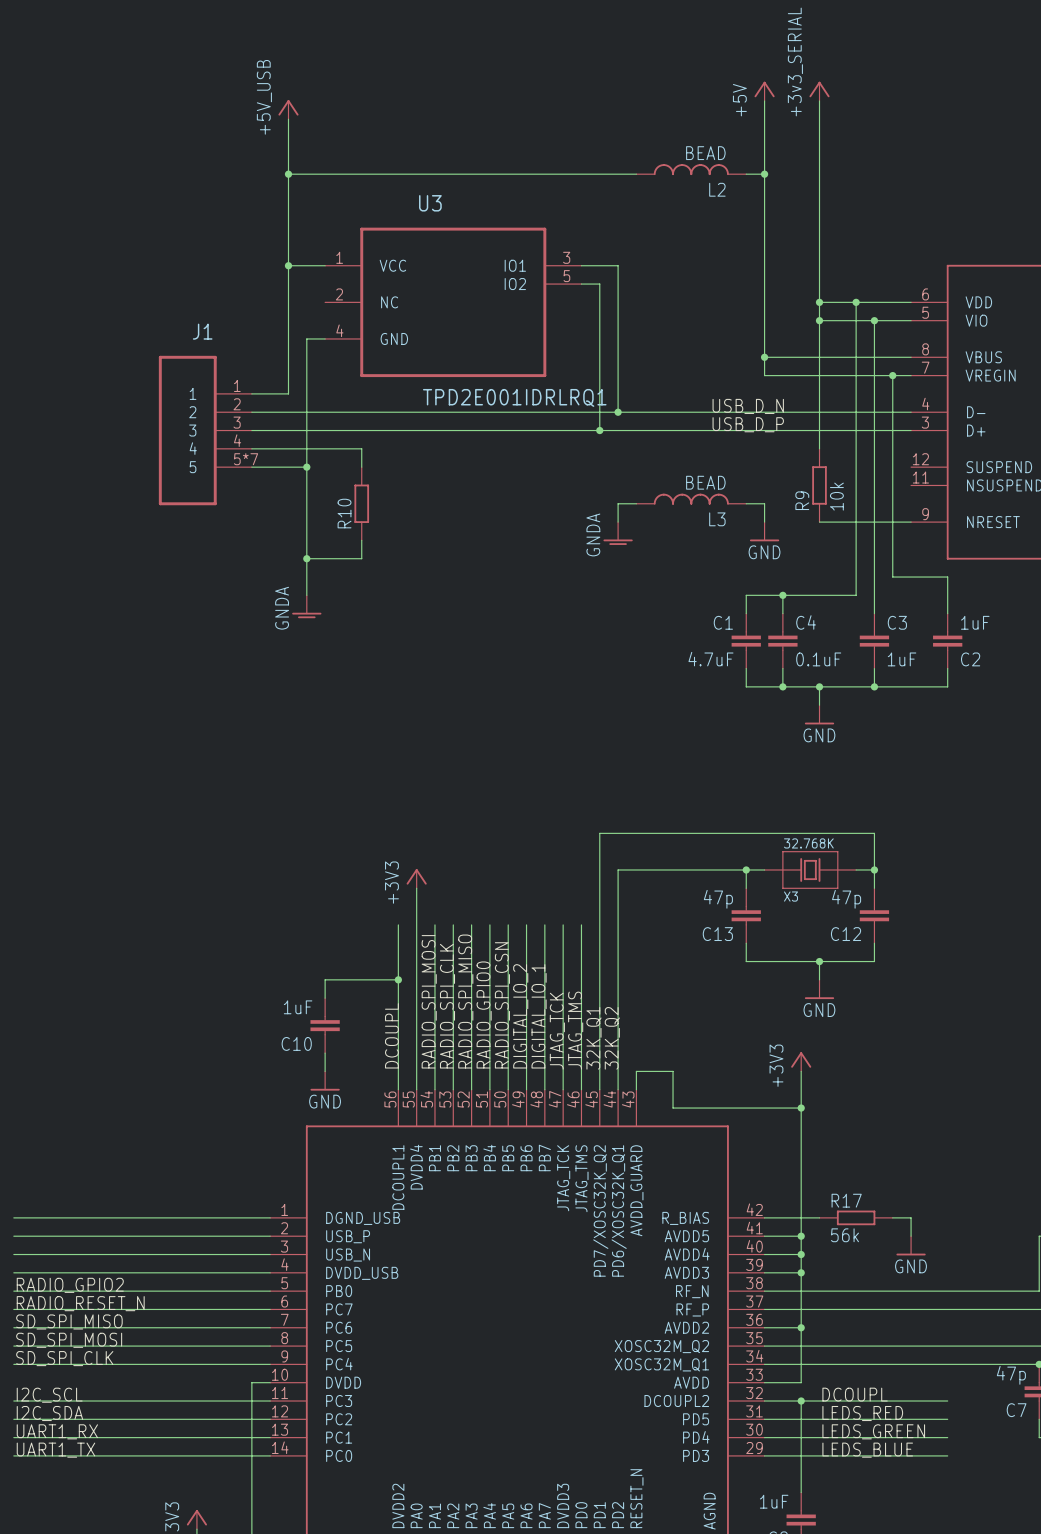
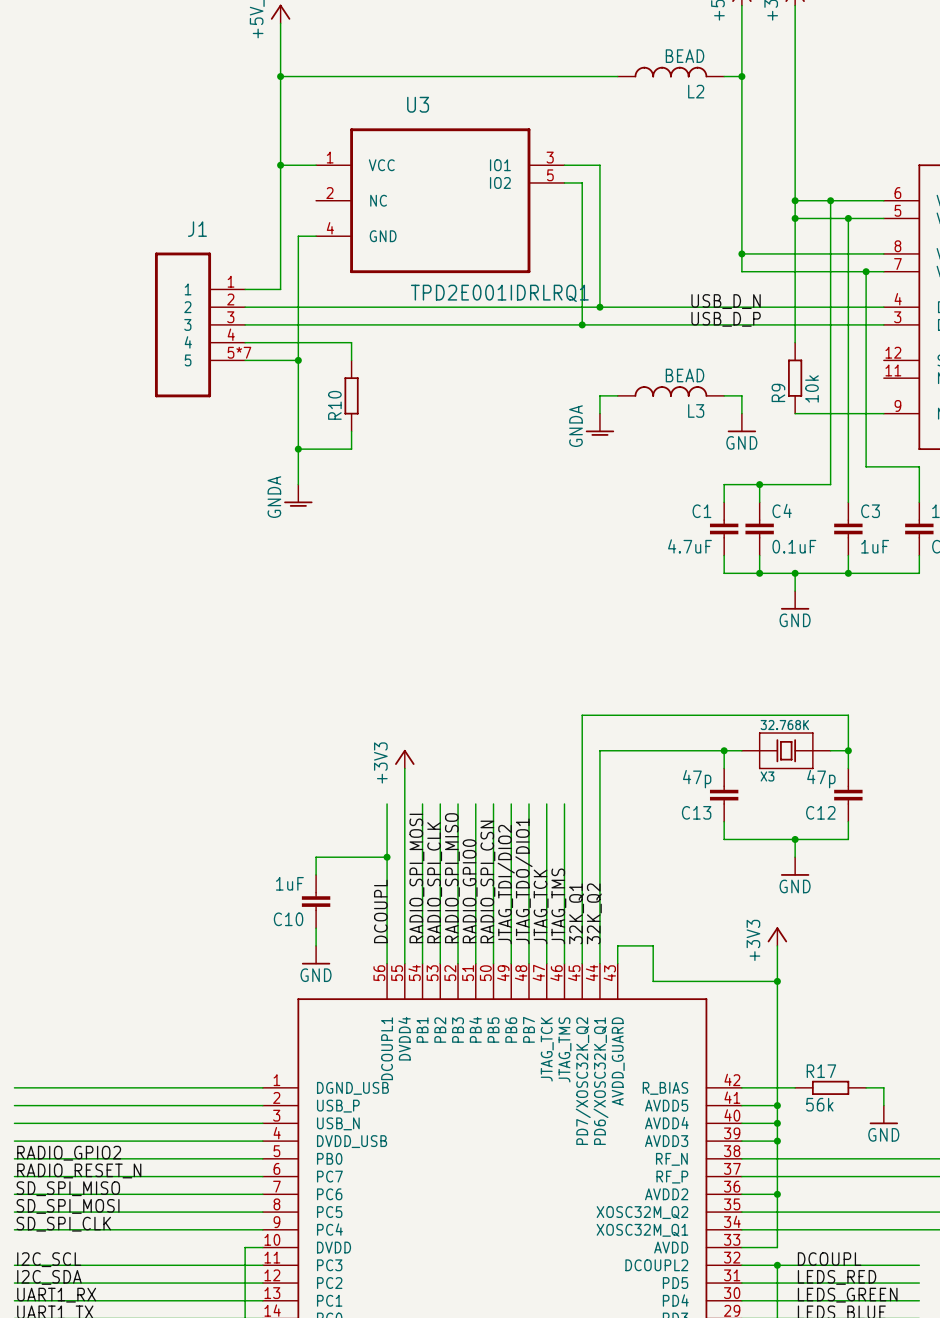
label: DIGITAL_IO_2 (520, 1016) -> JTAG_TDI/DIO2 (506, 884)
label: DIGITAL_IO_1 (539, 1016) -> JTAG_TDO/DIO1 (523, 881)

